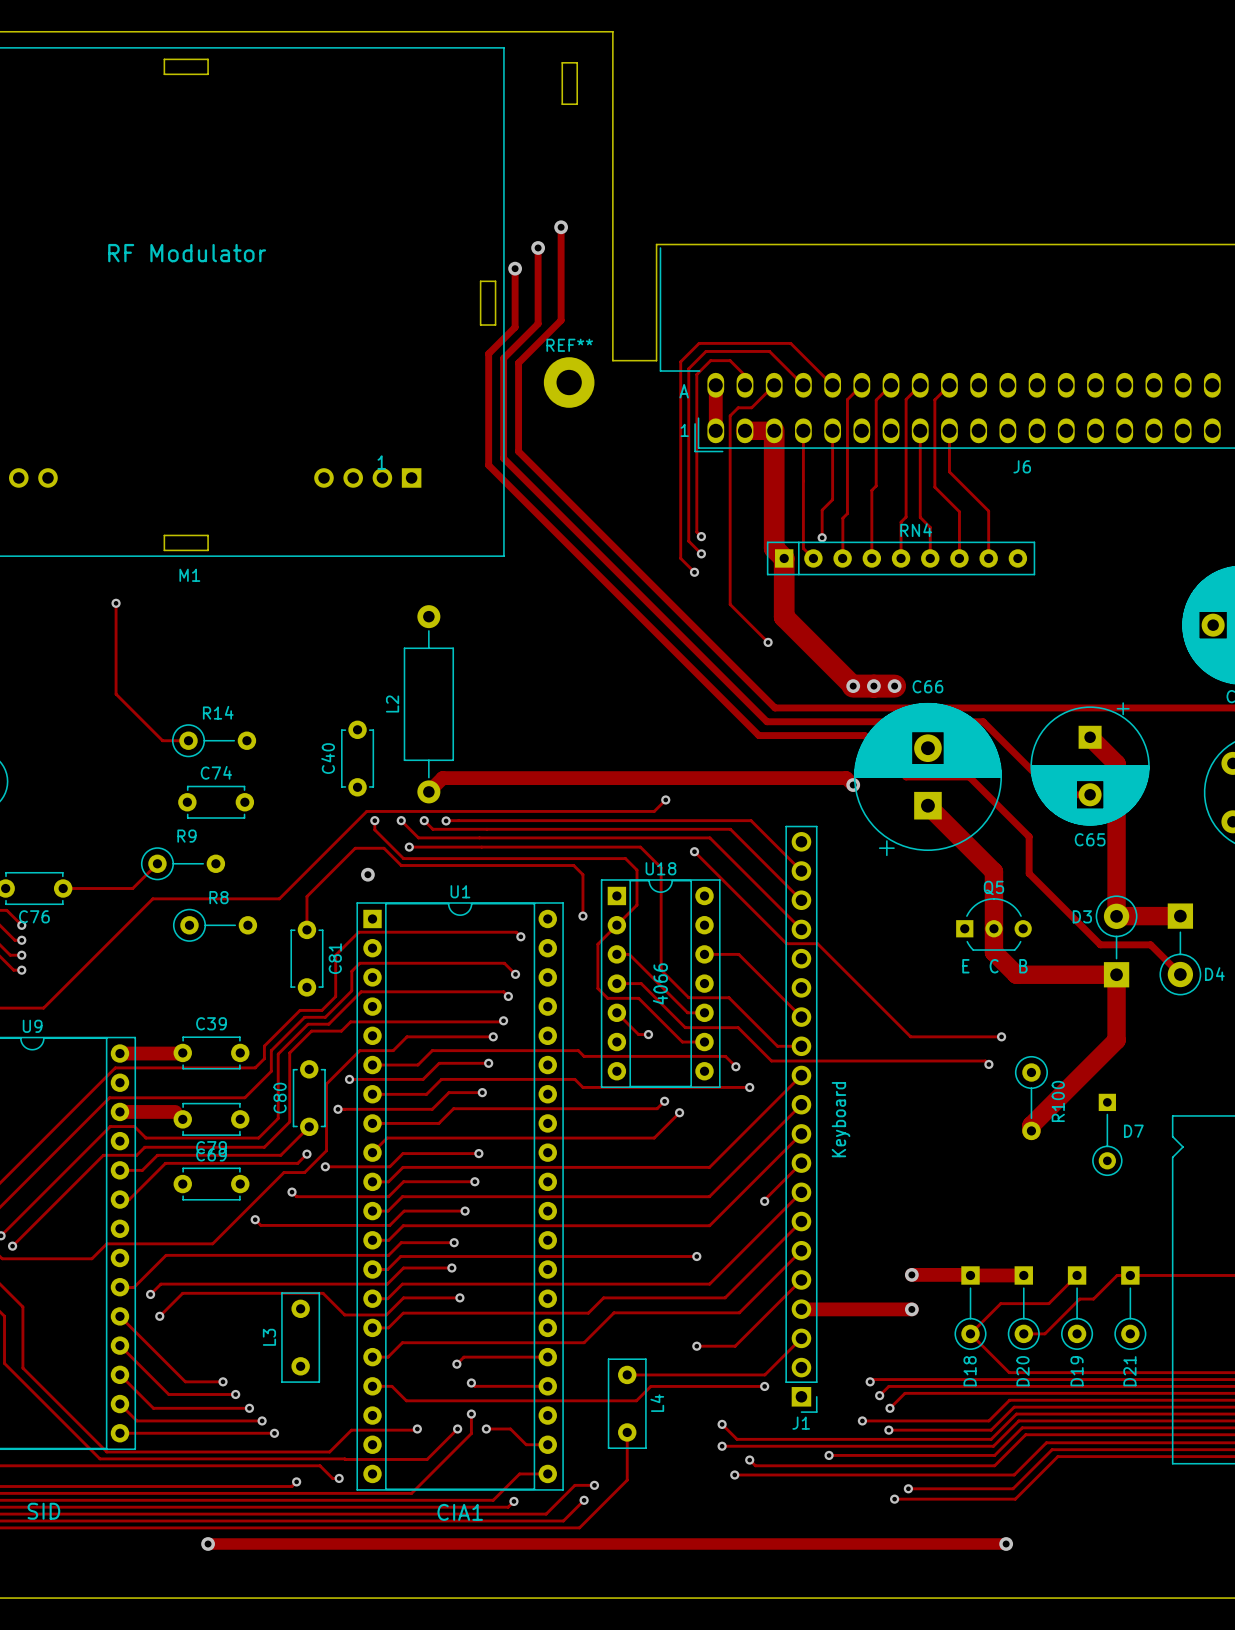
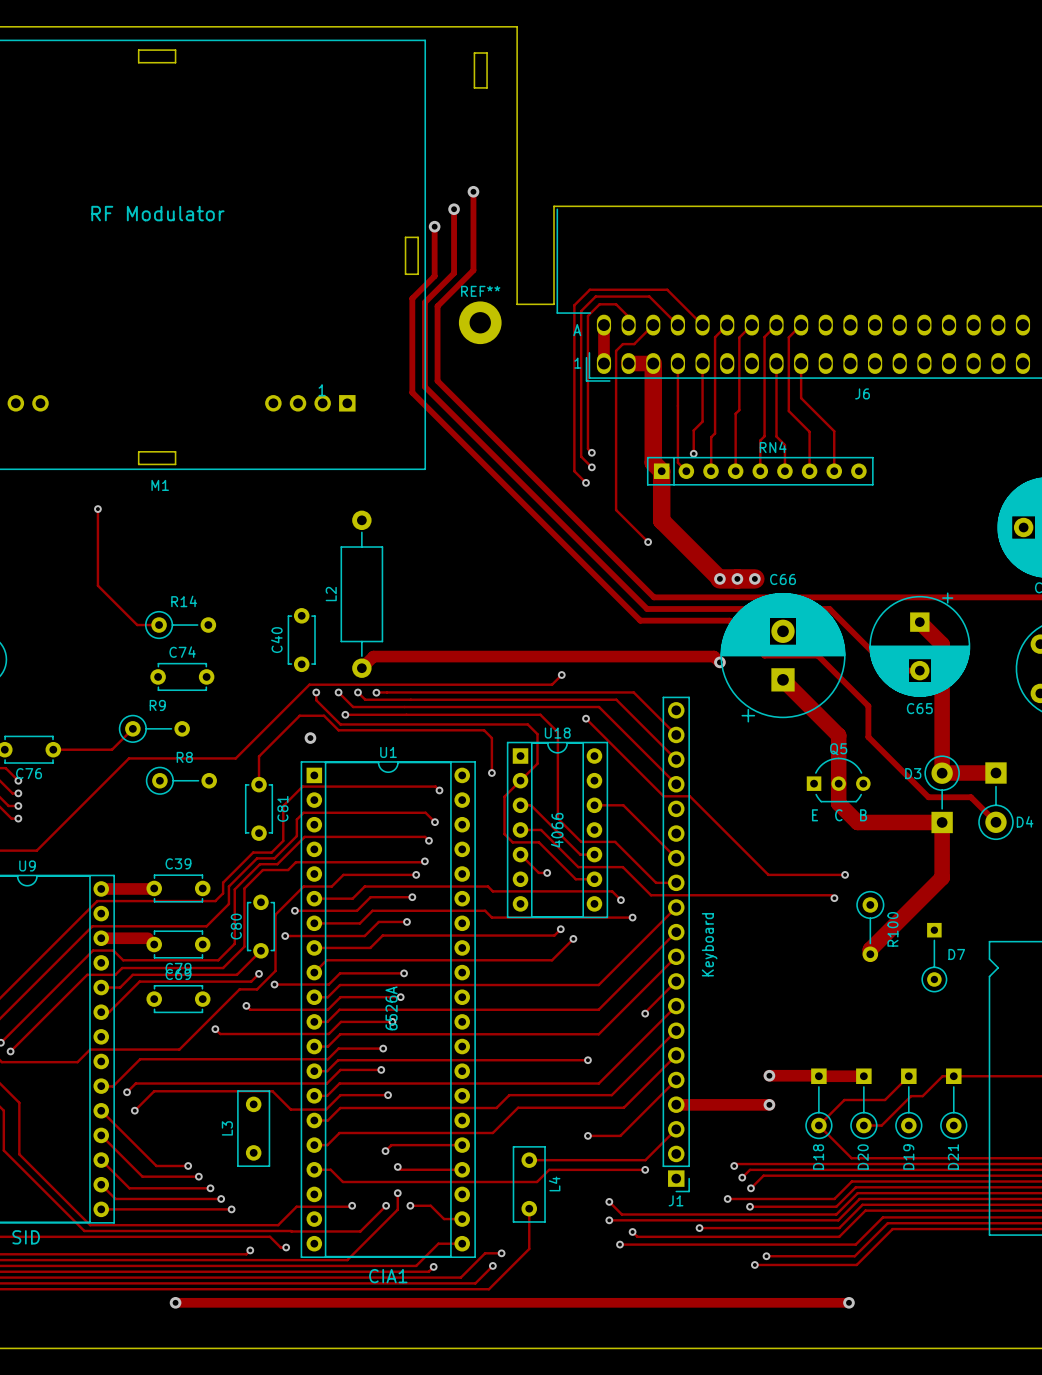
text: none -> 6526A (391, 1008)
text position: SID (43, 1511) -> SID (26, 1237)

